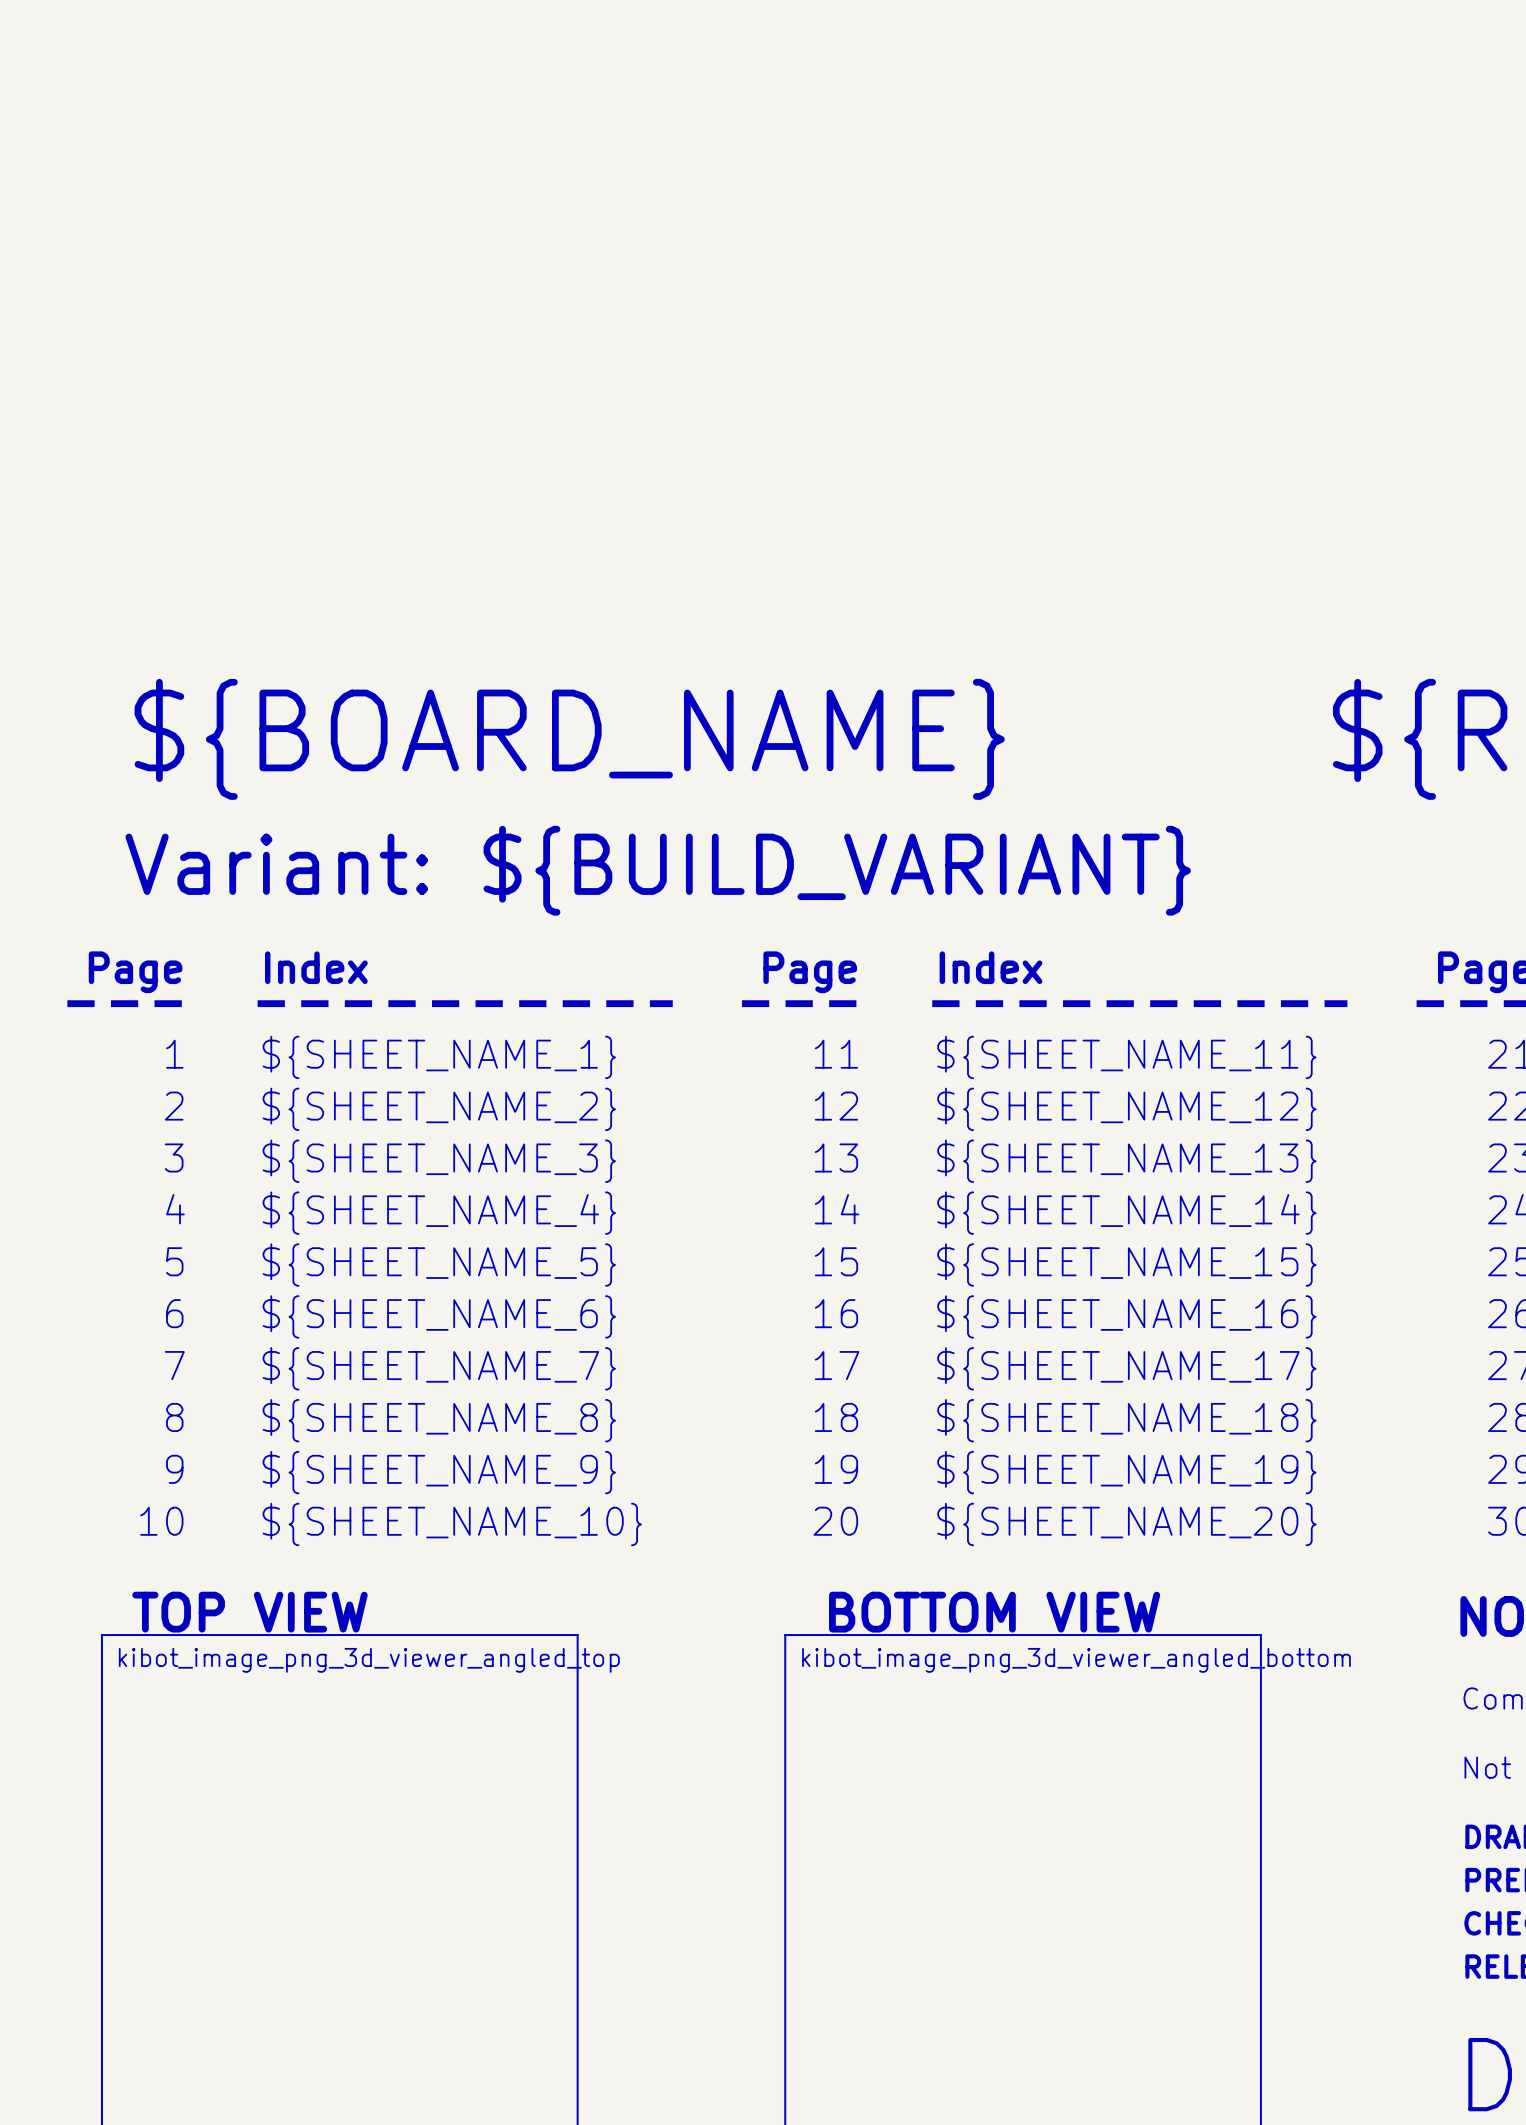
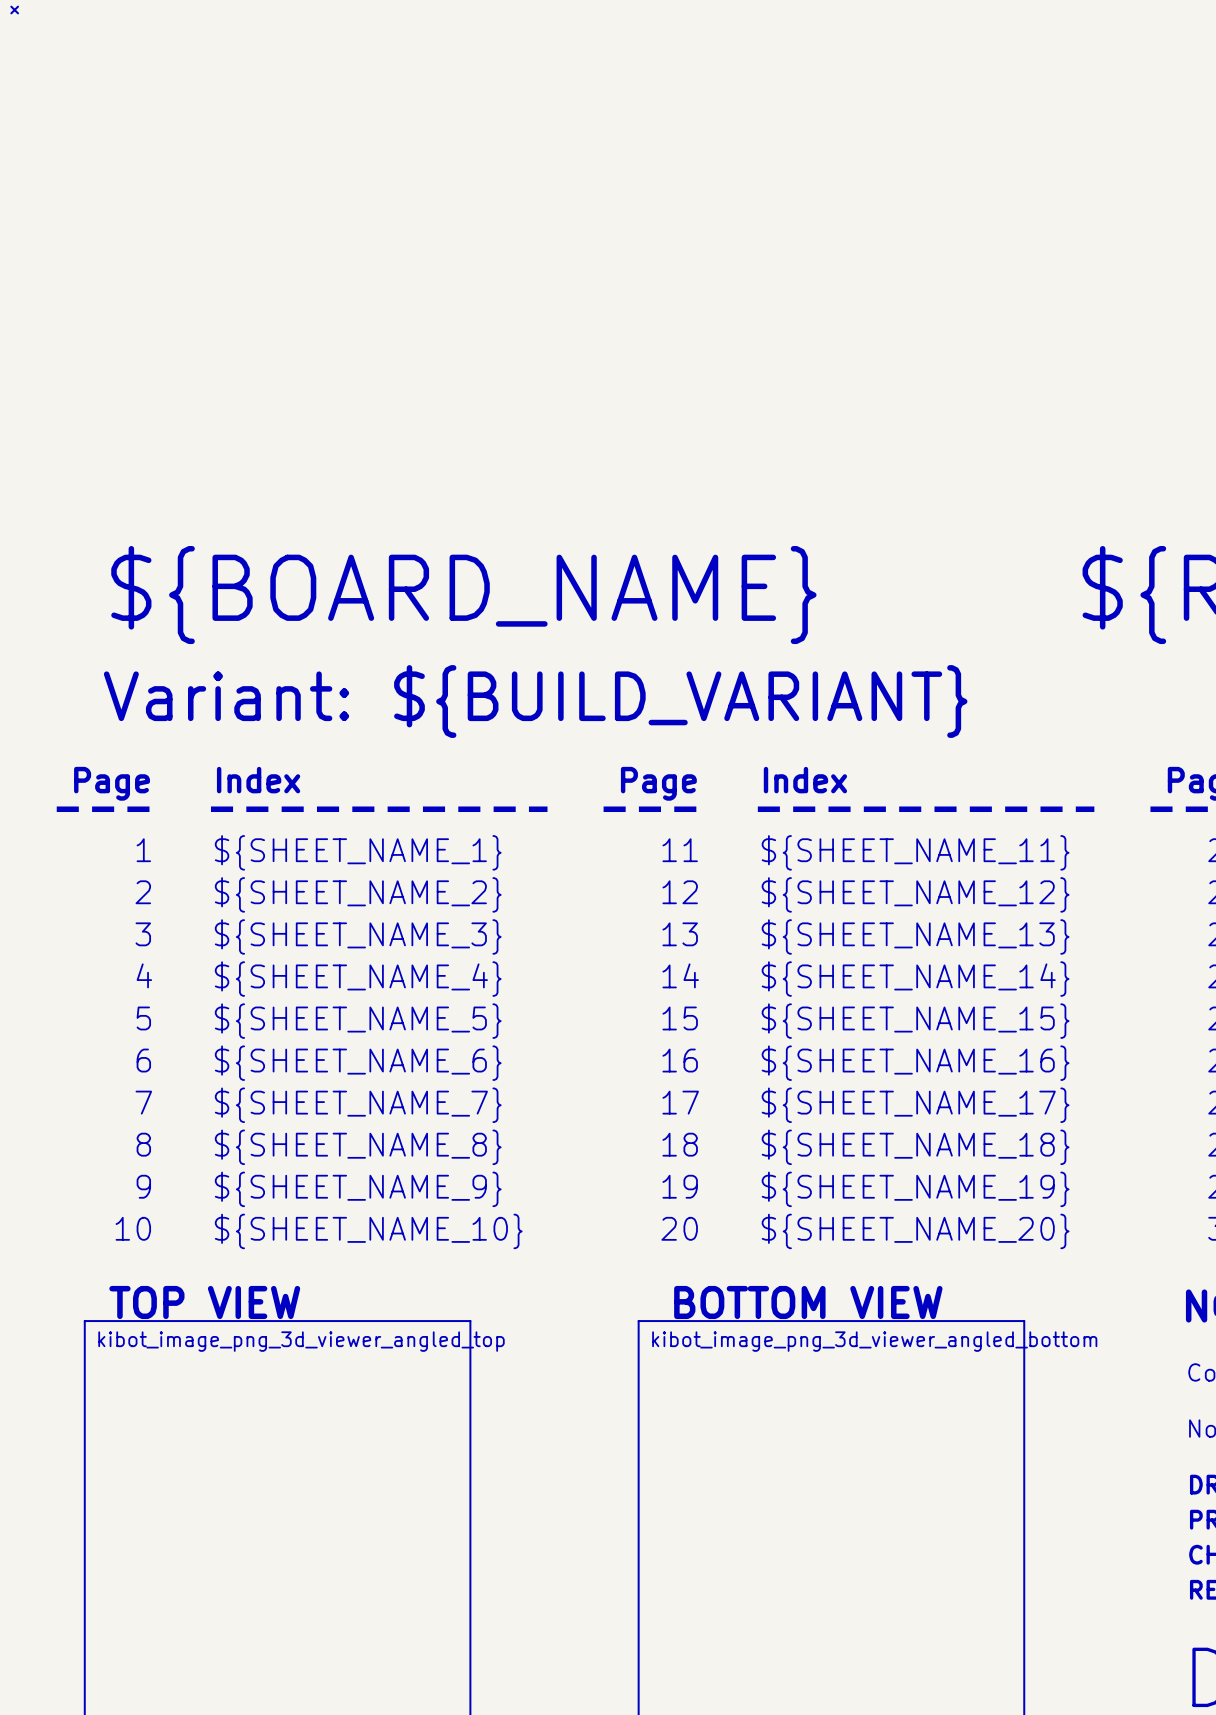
no-connect mark: none -> (14, 10)

